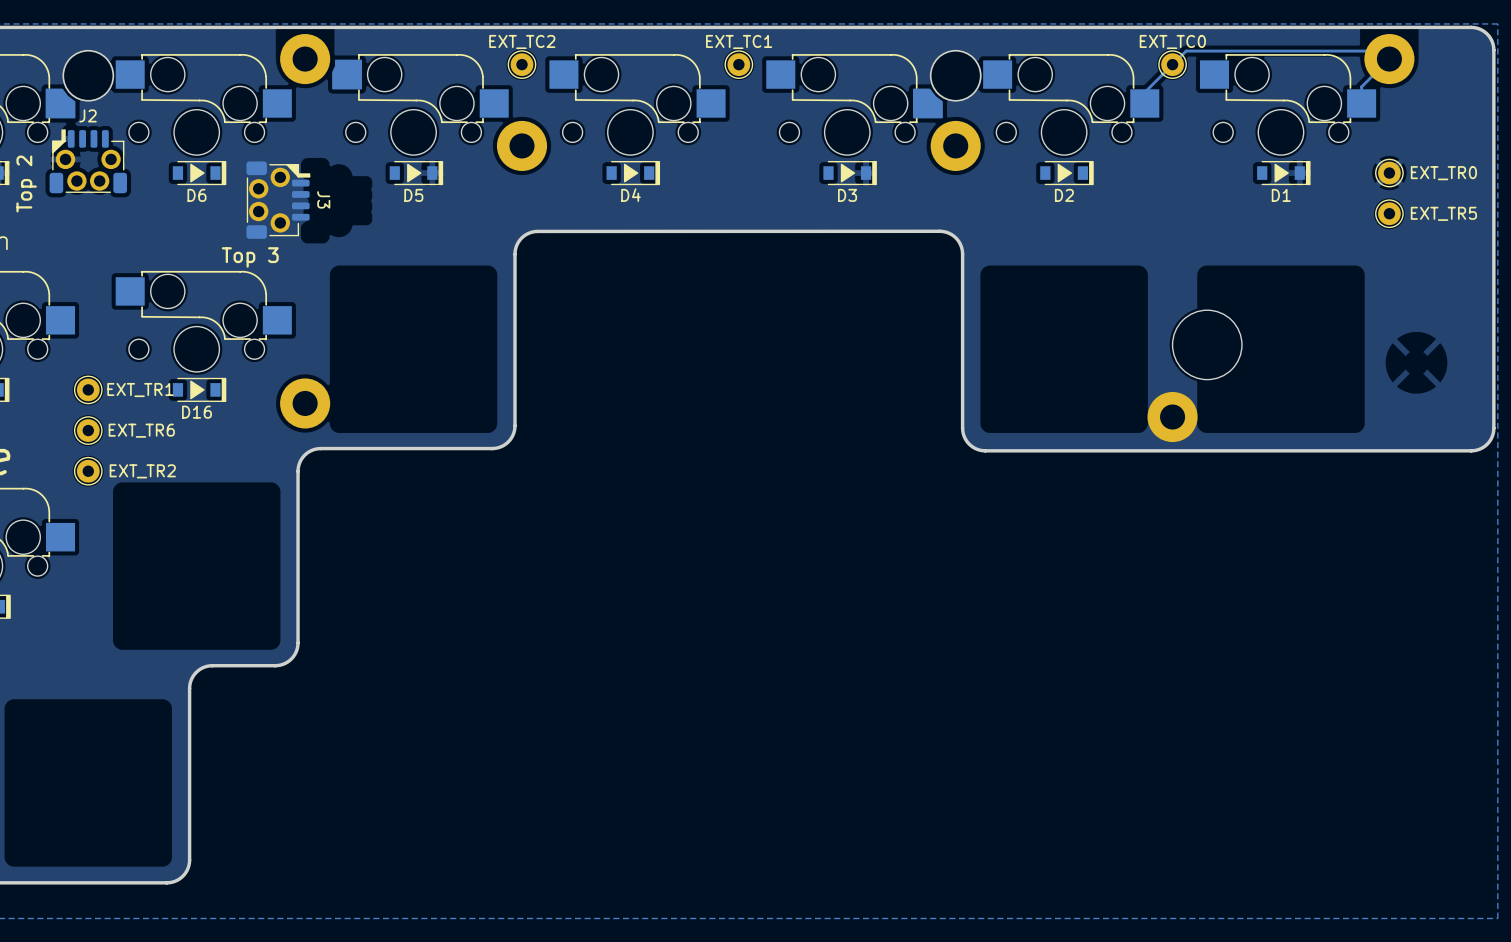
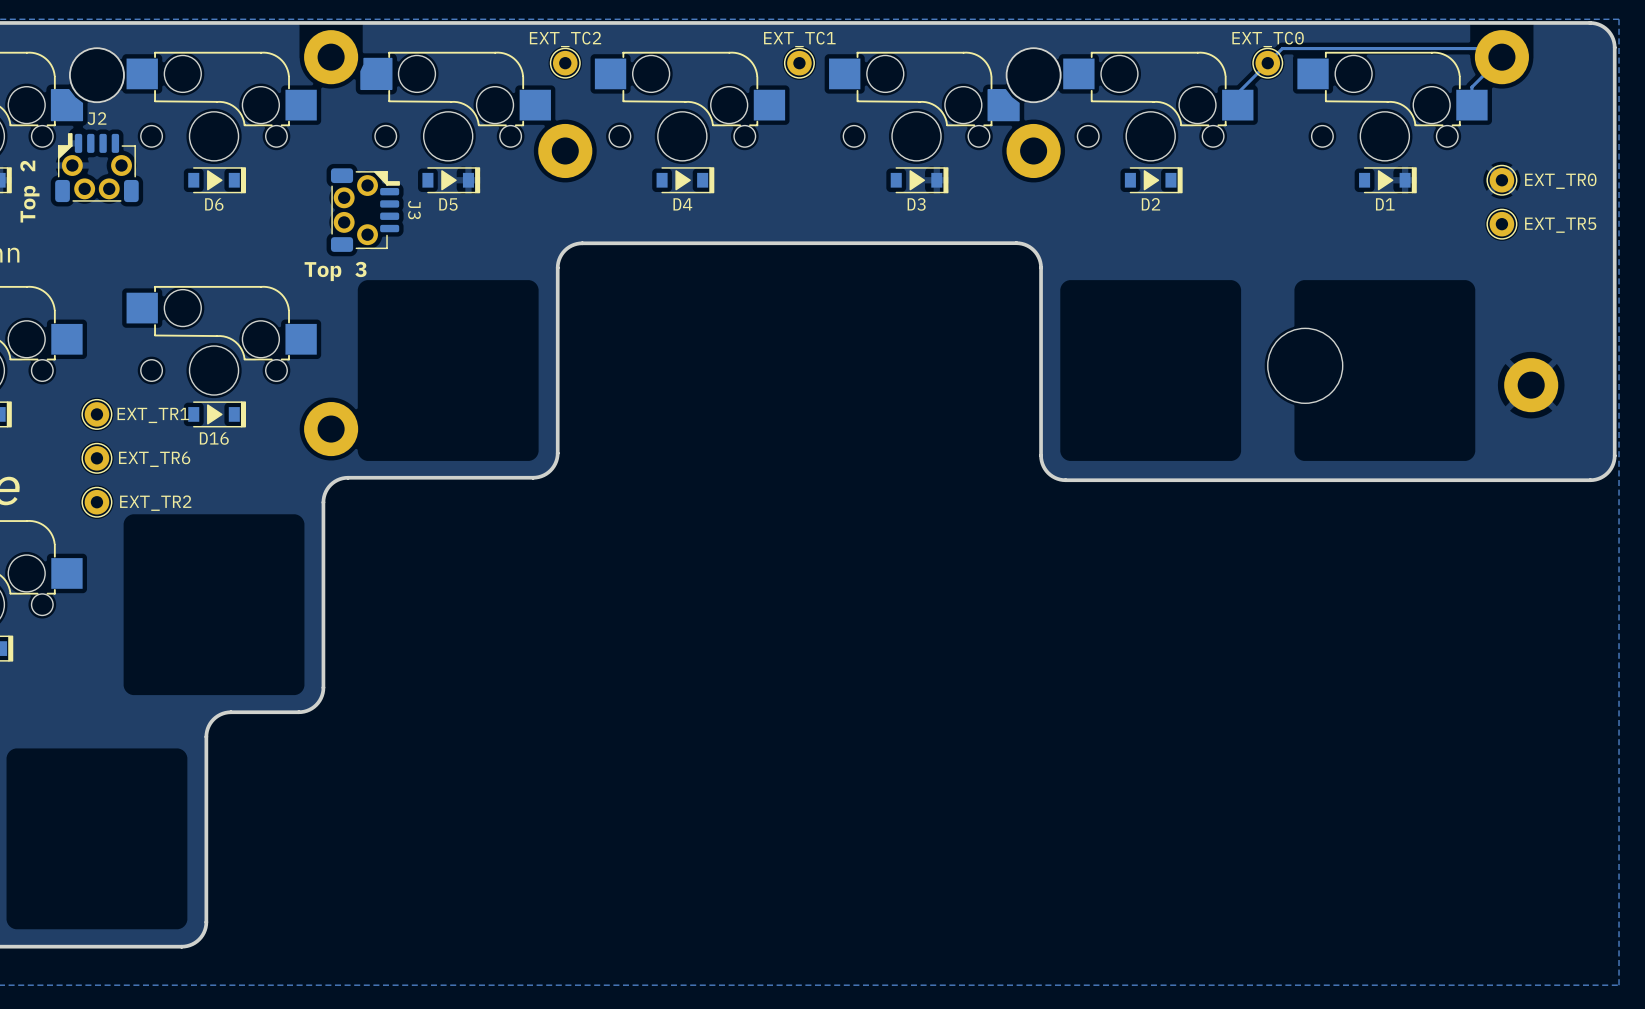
J3 position: (278, 200) -> (365, 210)
text position: Top 3 (250, 257) -> Top 3 (335, 271)
part position: (1172, 417) -> (1531, 385)

